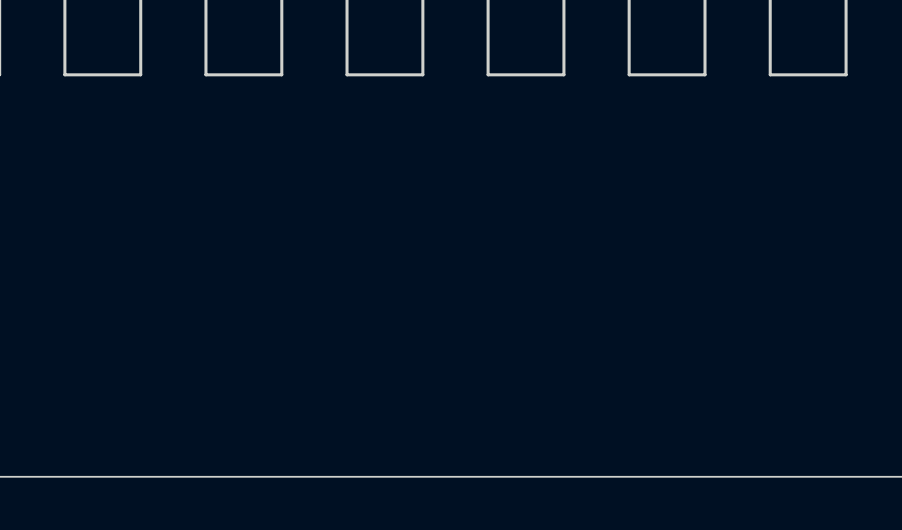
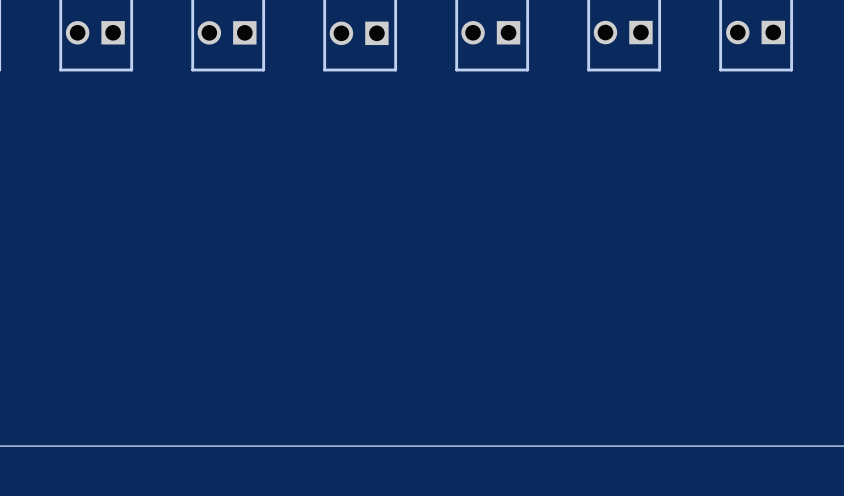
part: none -> (623, 32)
part: none -> (755, 32)
part: none -> (95, 32)
part: none -> (227, 32)
part: none -> (359, 33)
part: none -> (490, 32)

